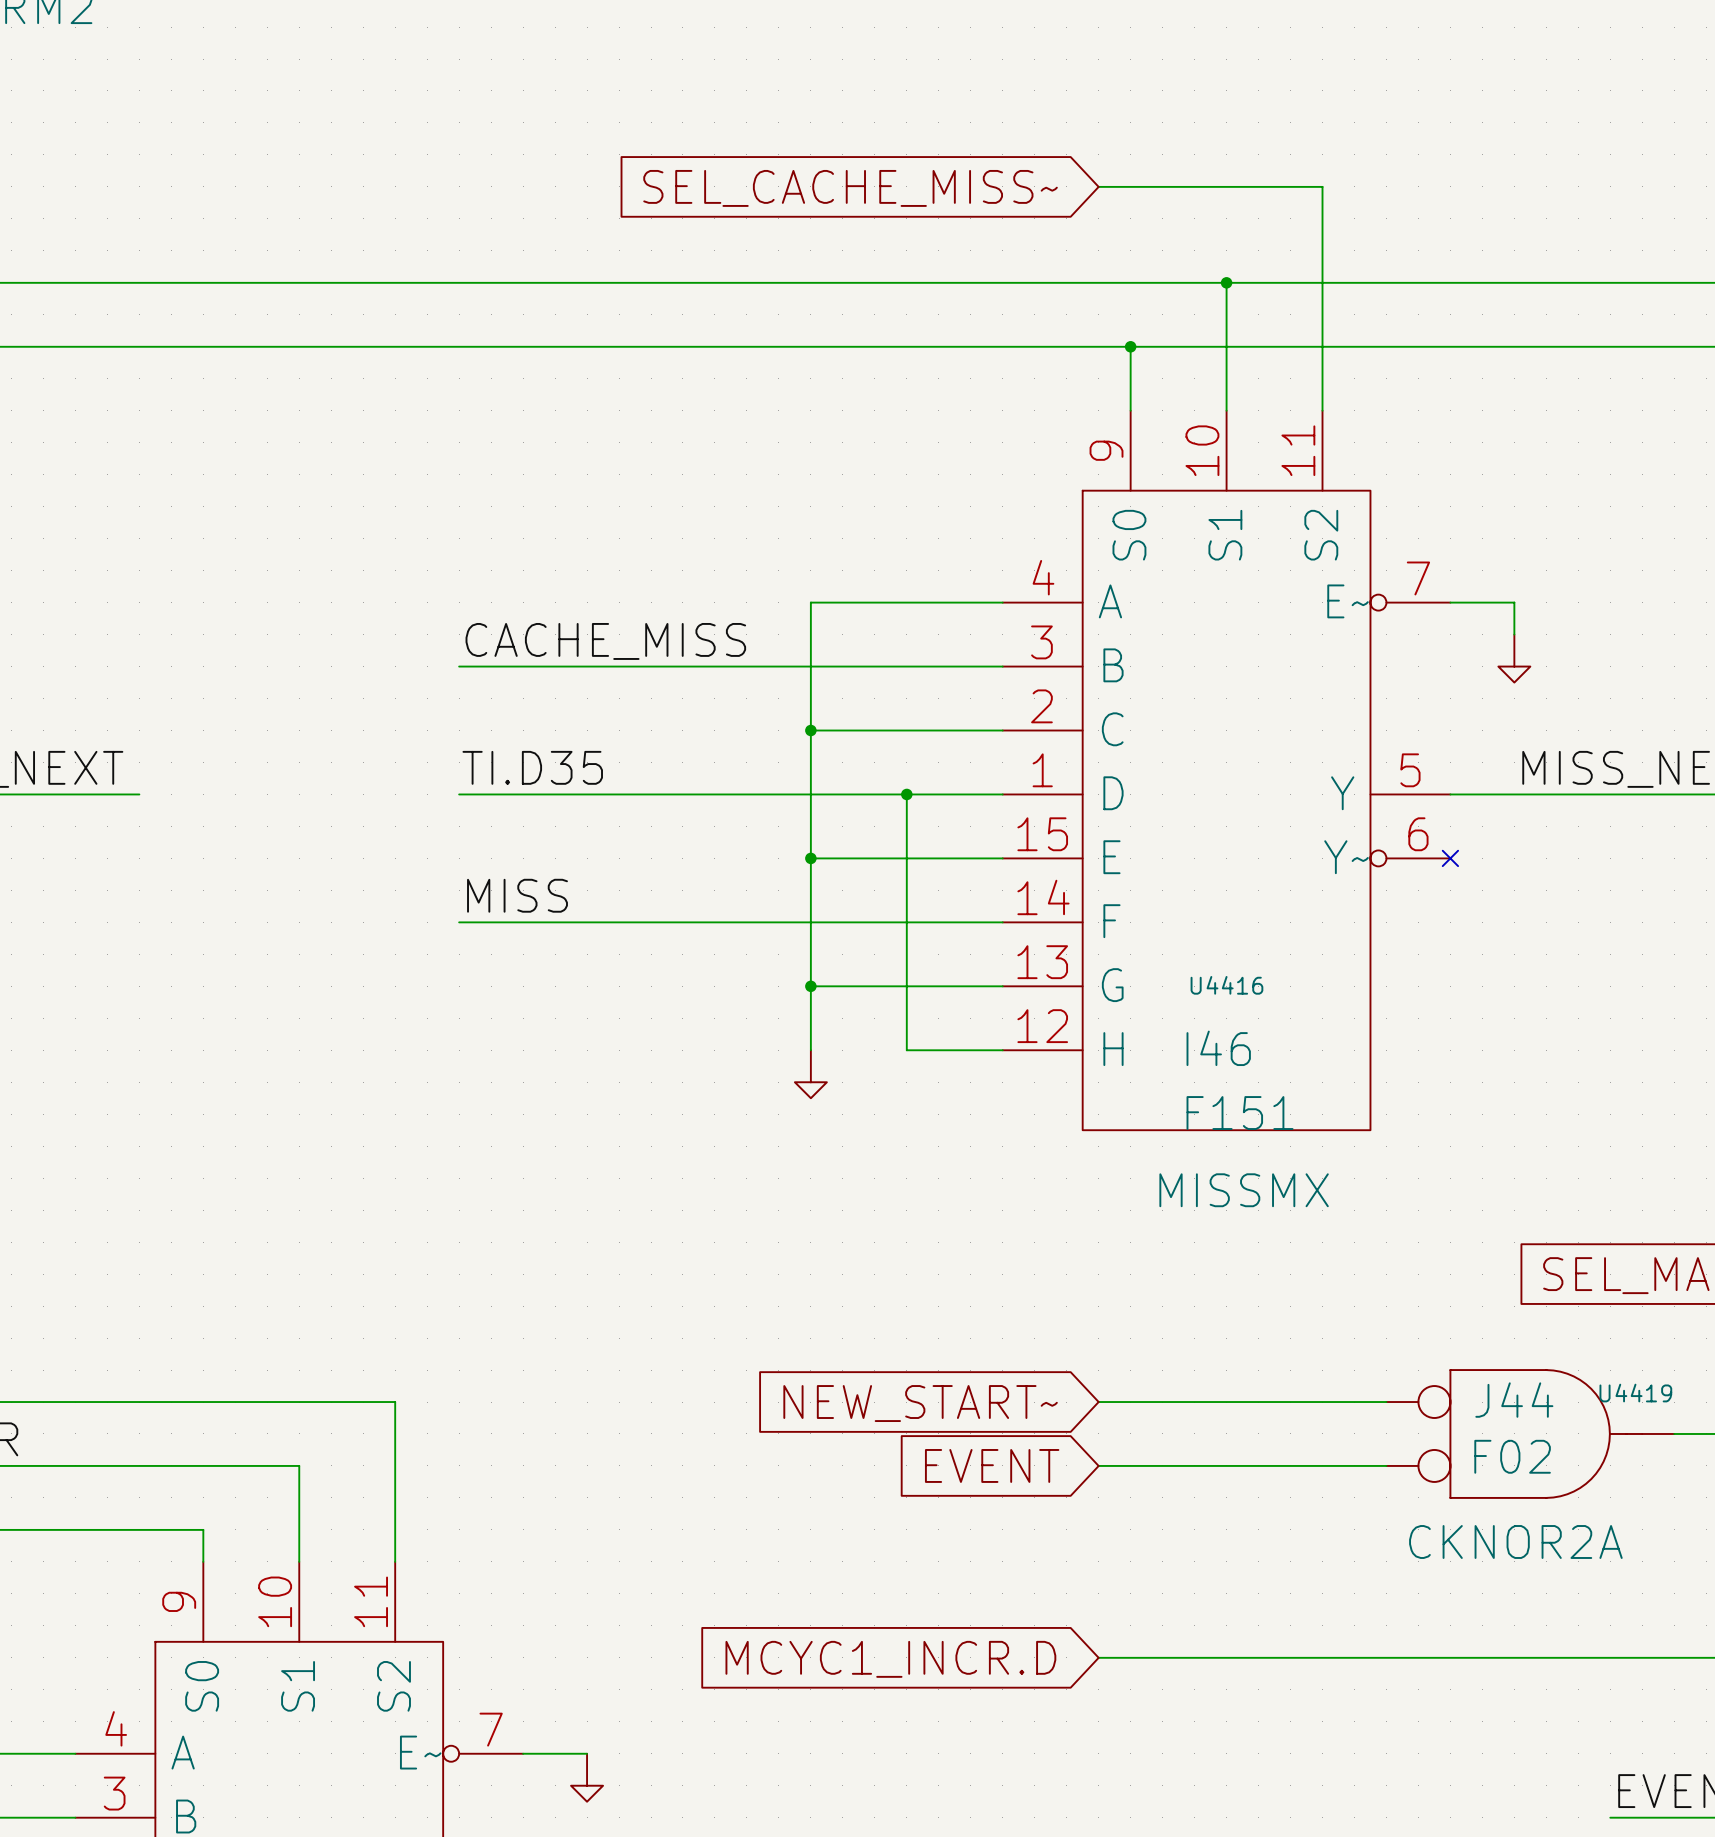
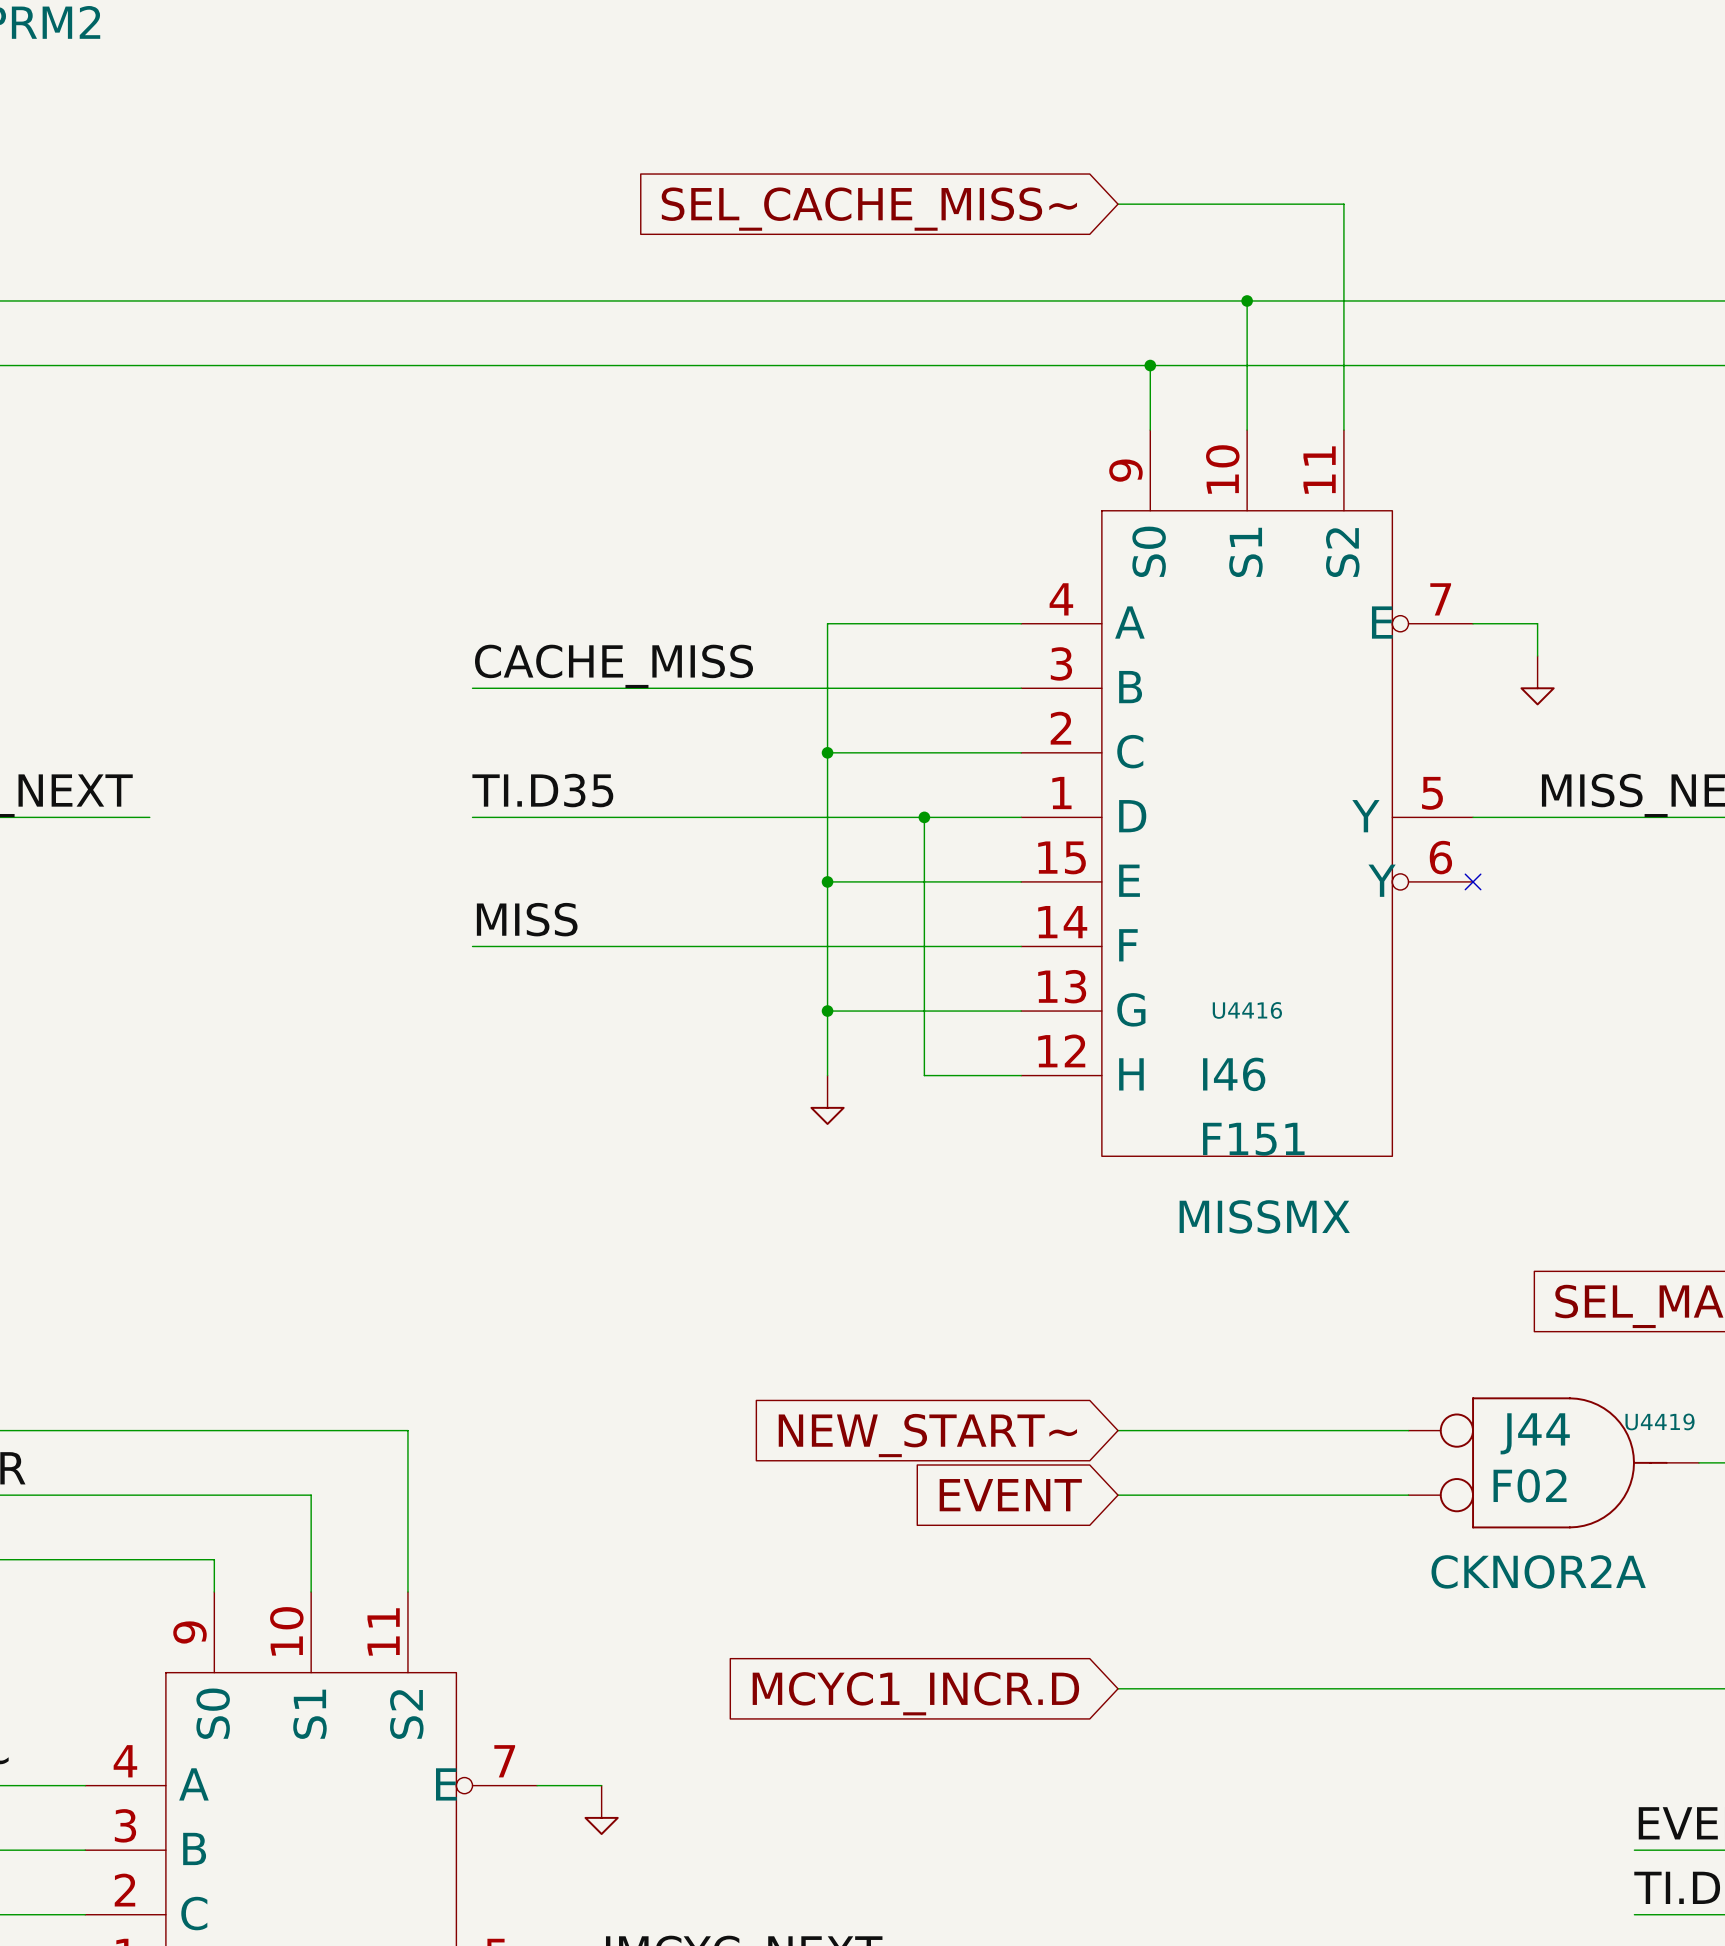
U4416 pin name: E~ (1348, 601) -> E (1382, 622)
U4416 pin name: Y~ (1346, 857) -> Y (1382, 880)
part pin name: E~ (420, 1752) -> E (446, 1784)

